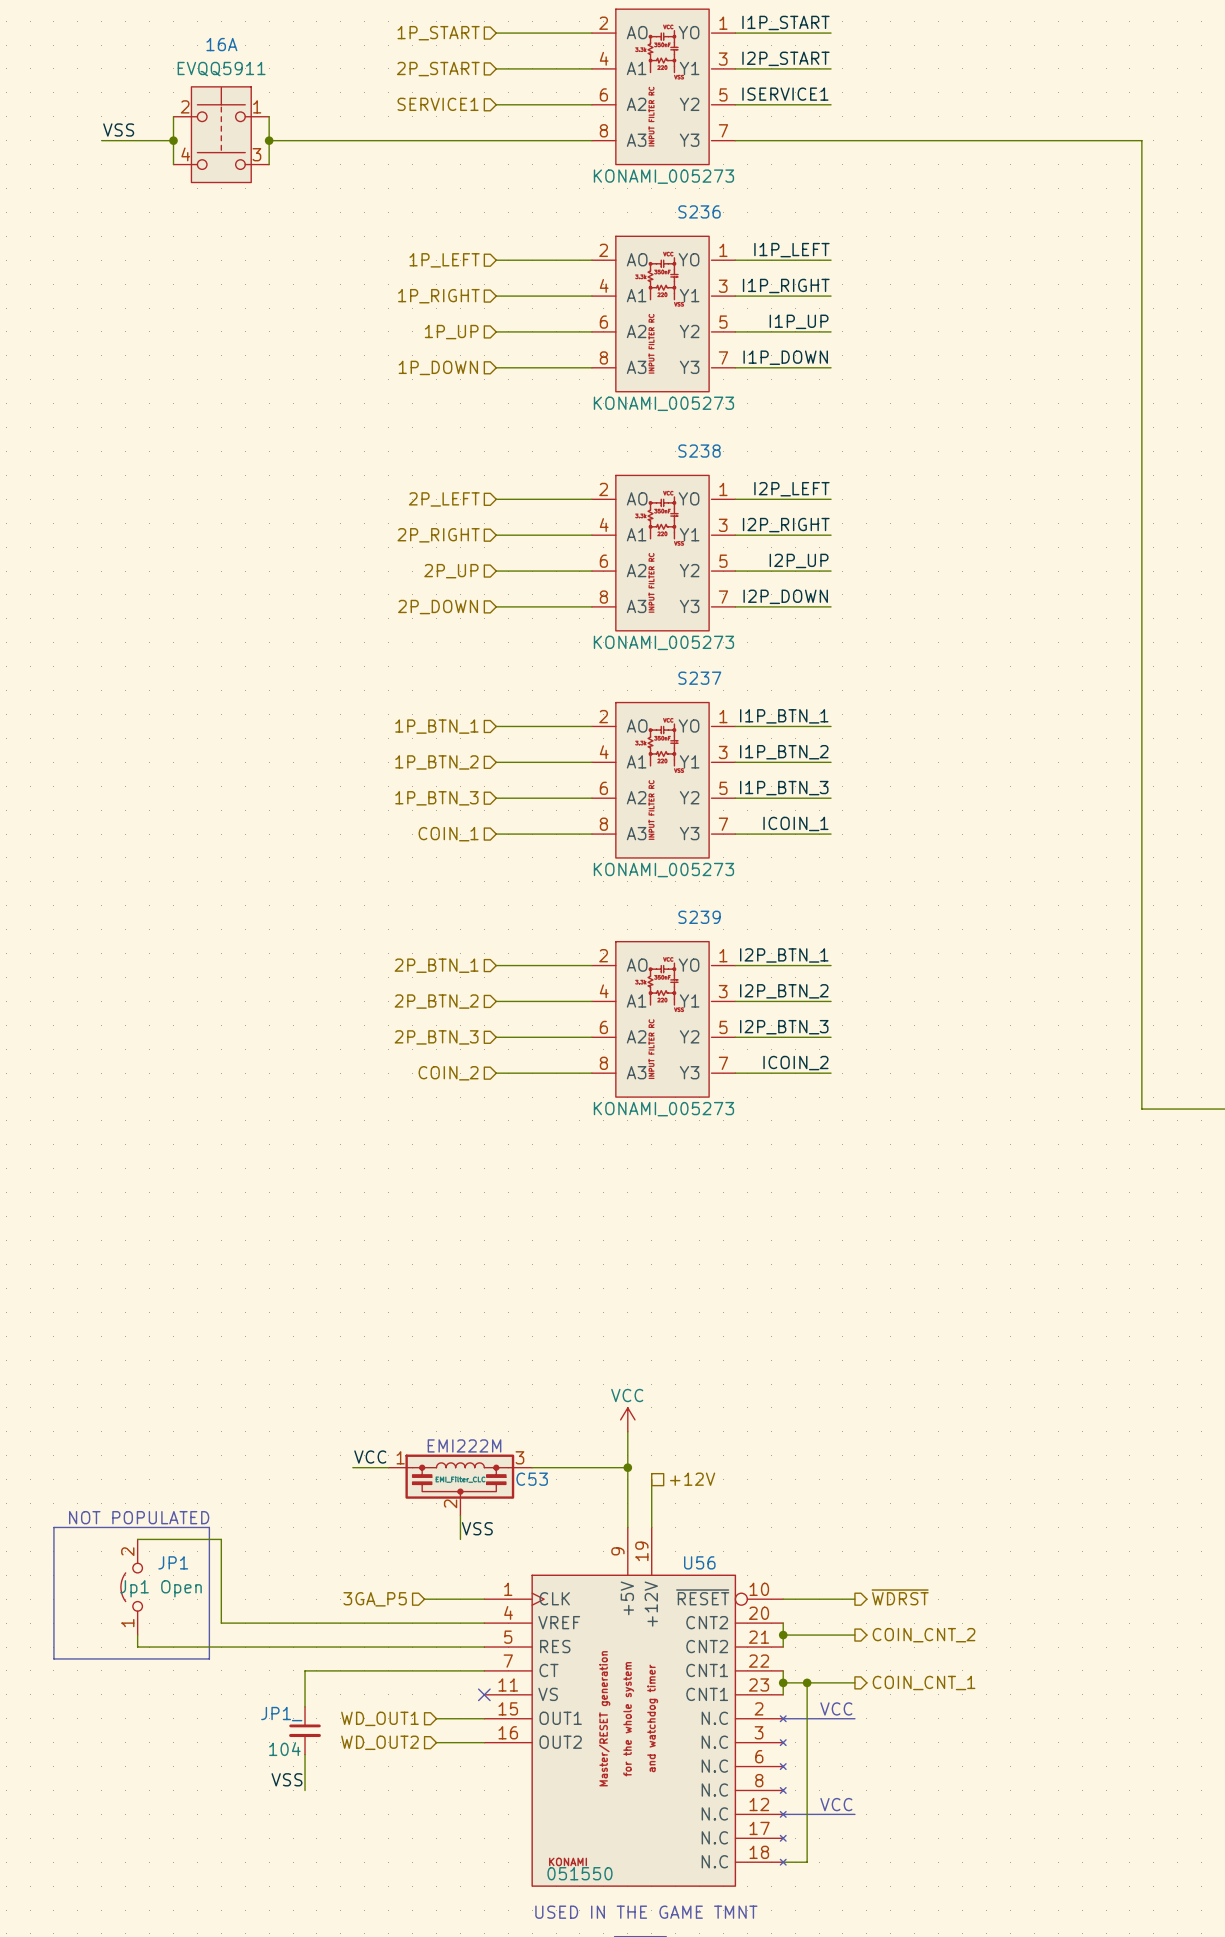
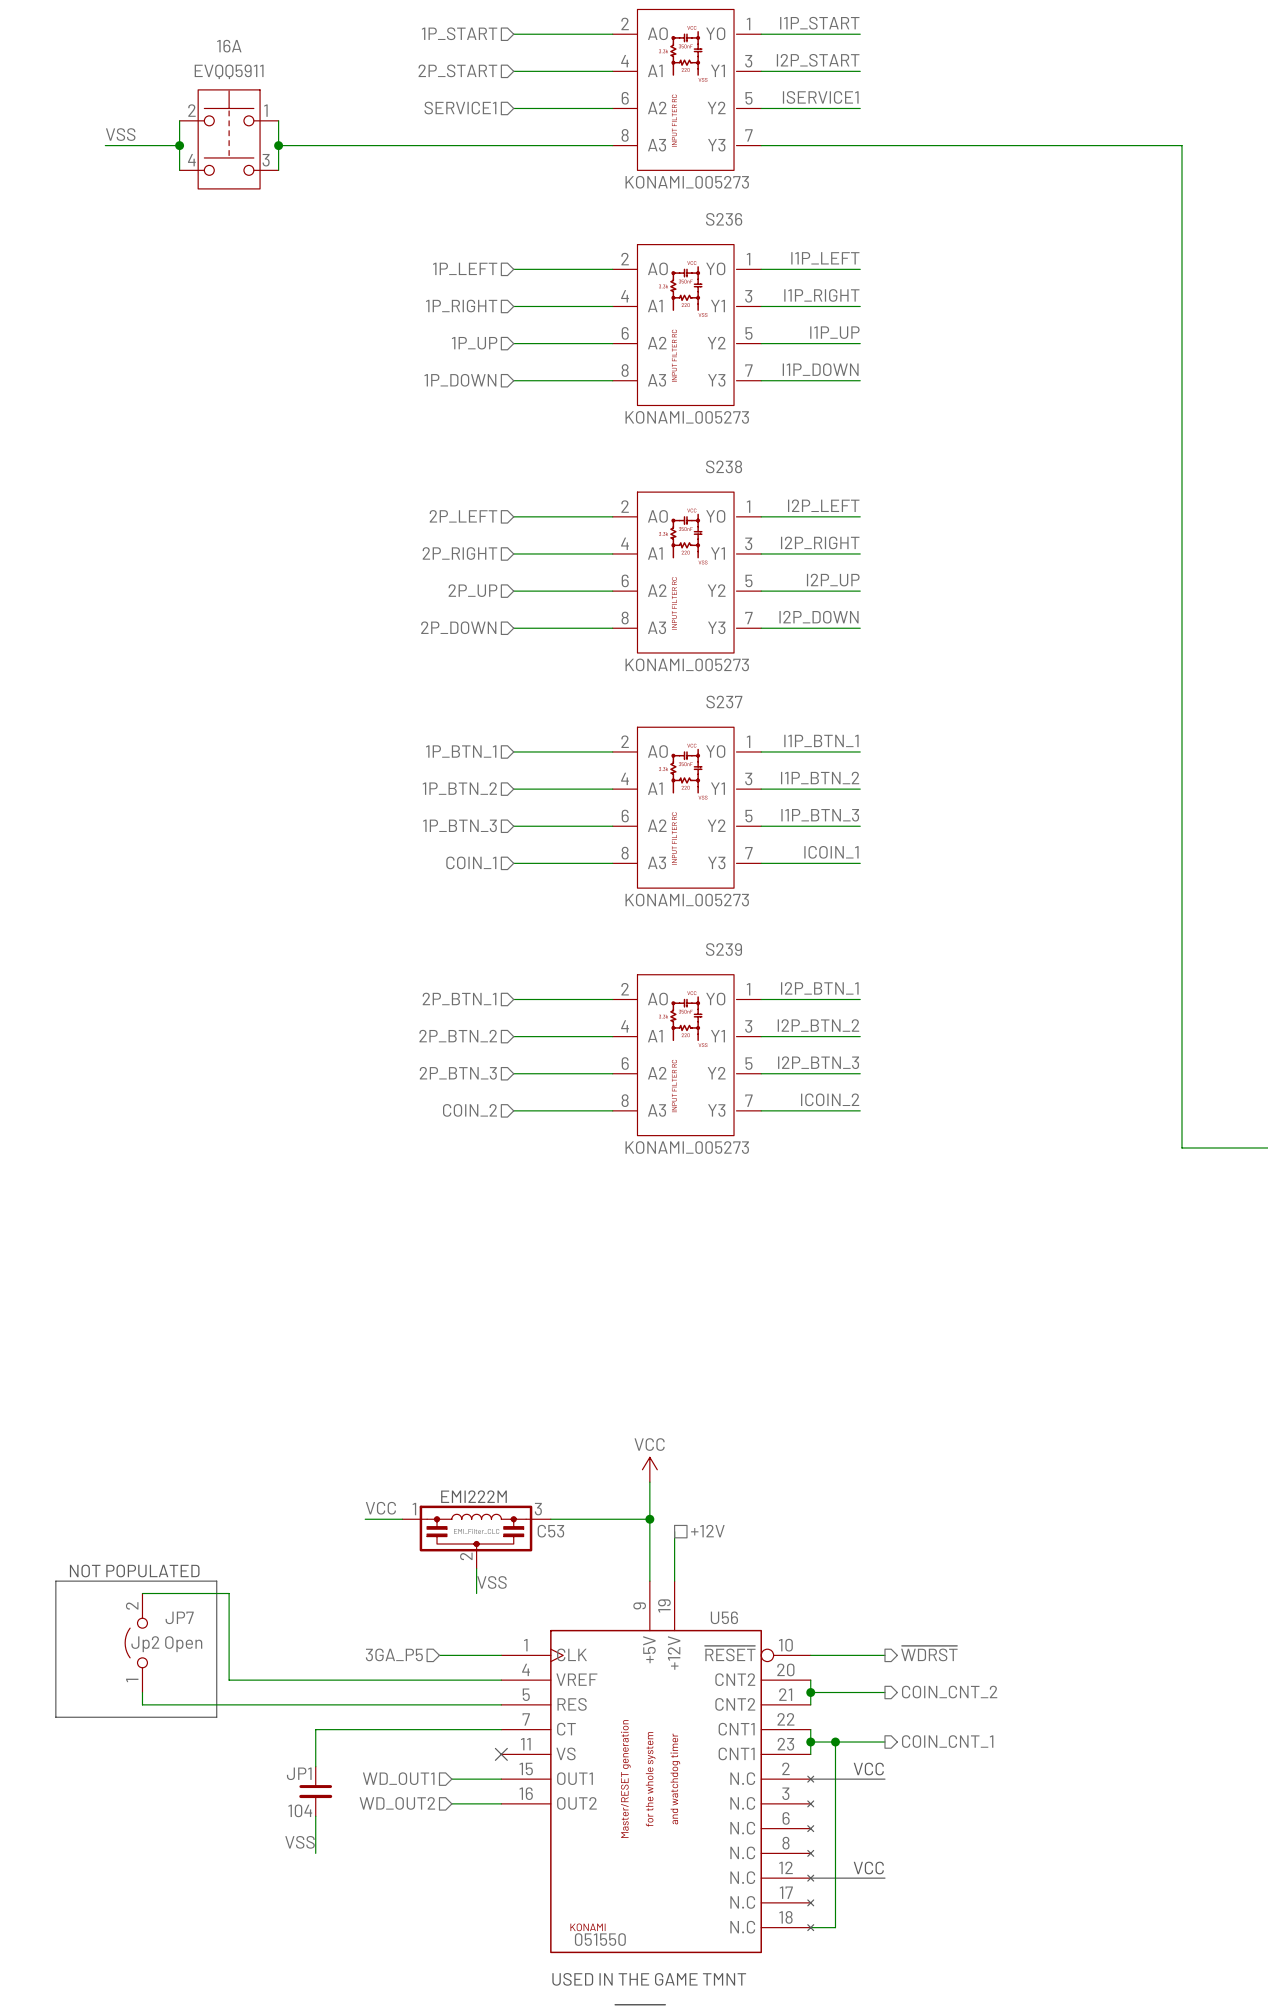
JP1 name: JP1 (173, 1562) -> JP7 (179, 1617)
JP1 value: Jp1 Open (160, 1588) -> Jp2 Open (166, 1644)
JP1_ name: JP1_ (281, 1714) -> JP1 (299, 1773)

